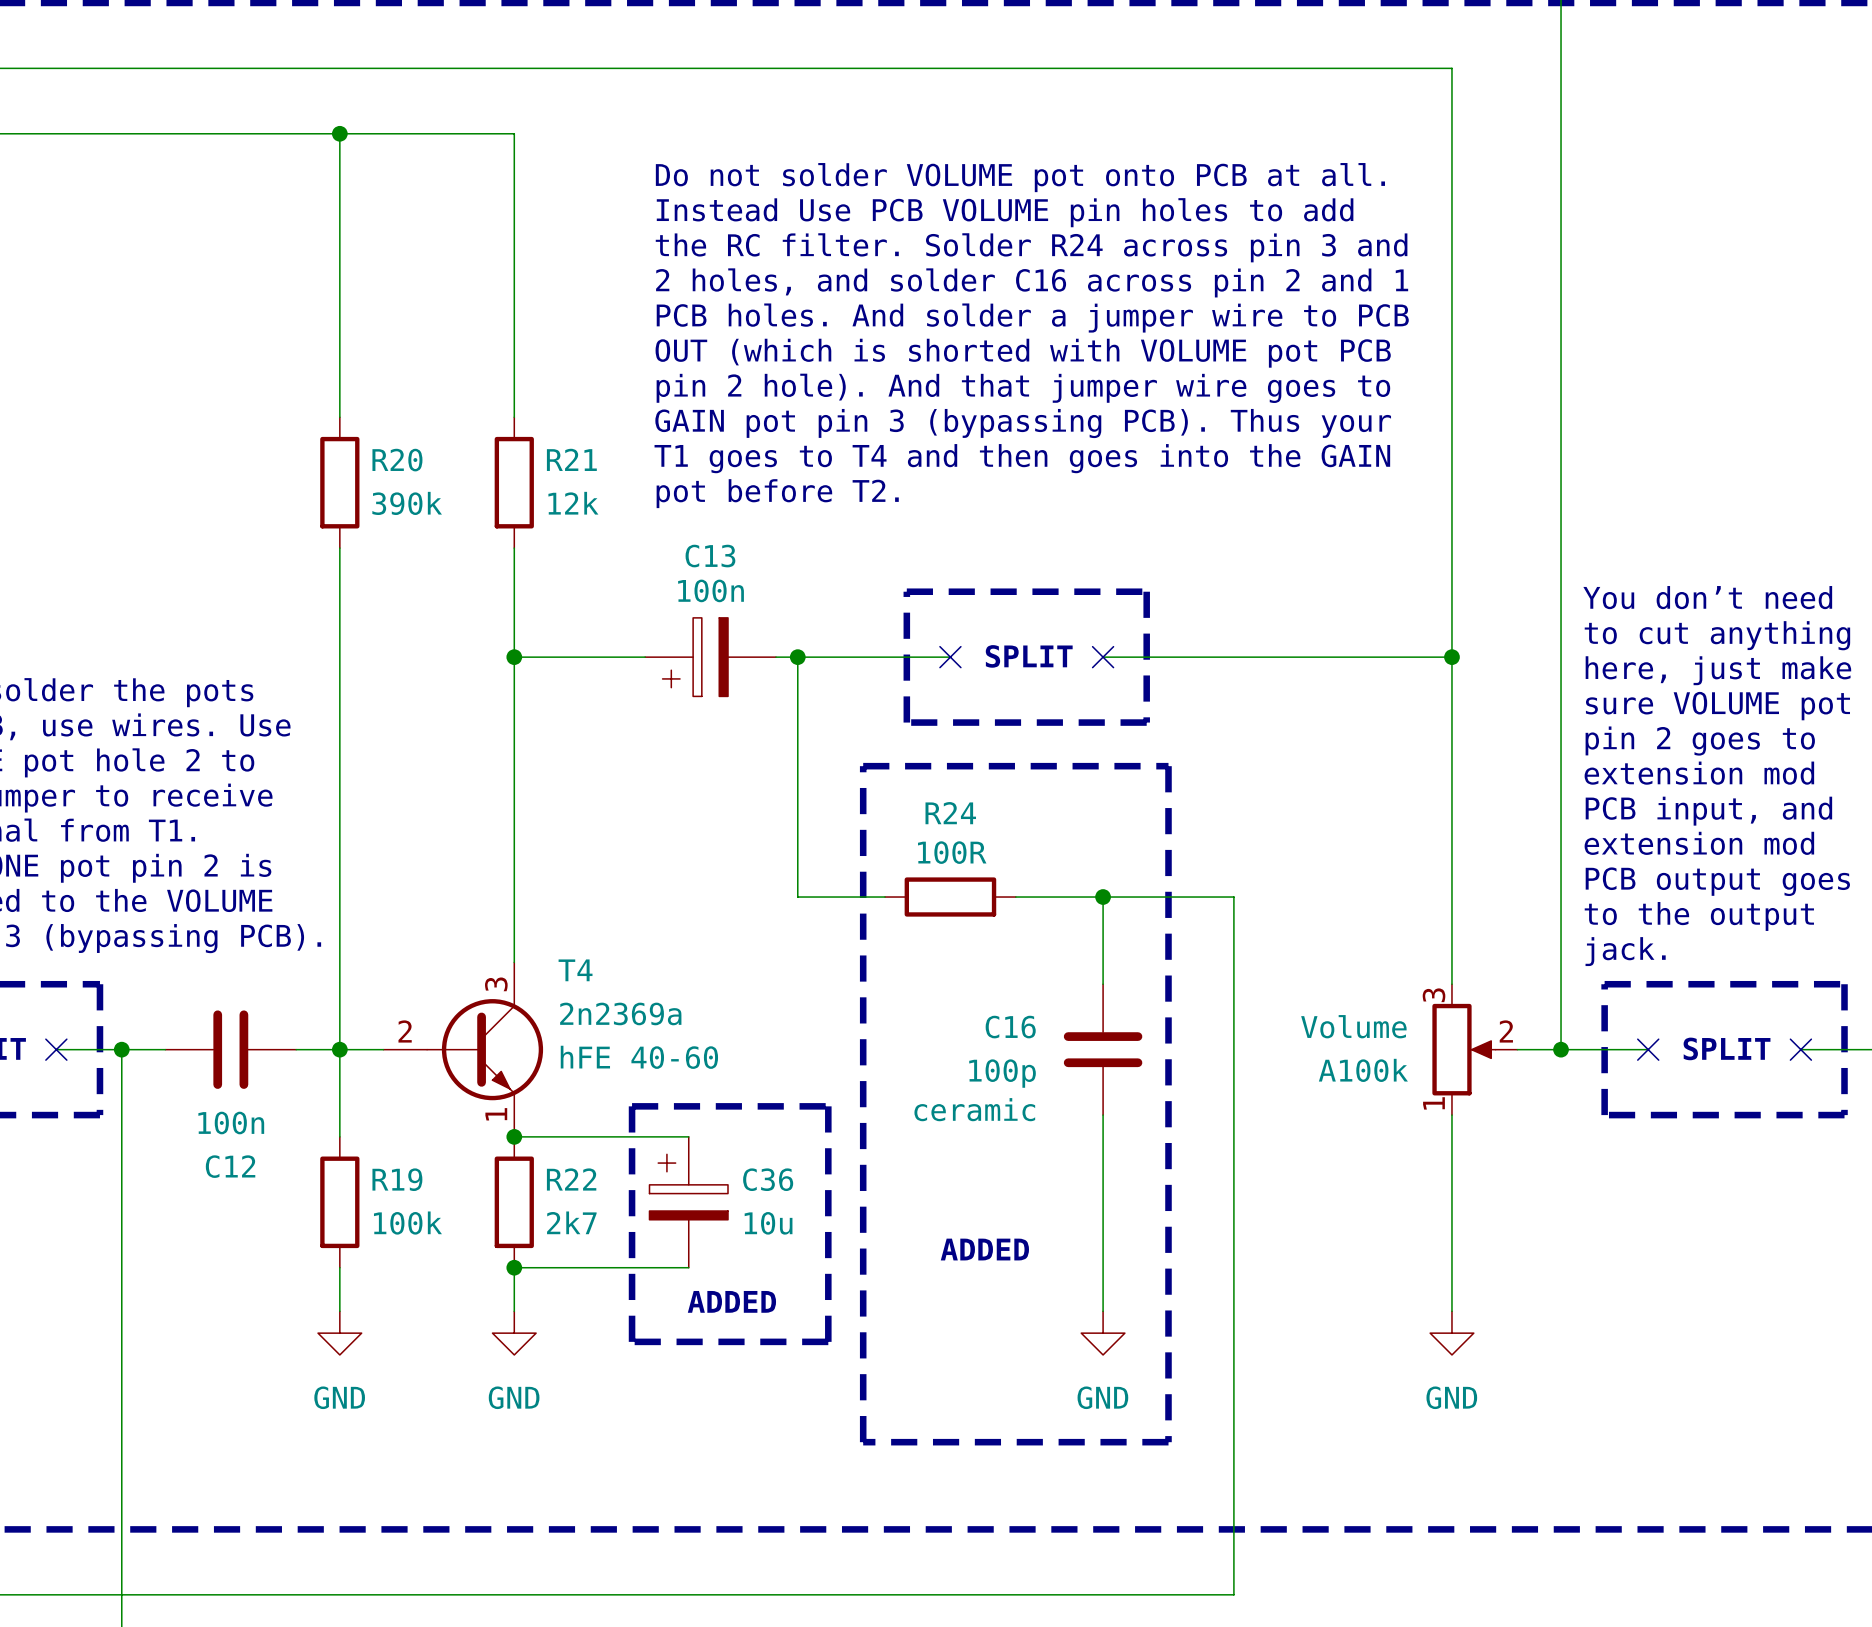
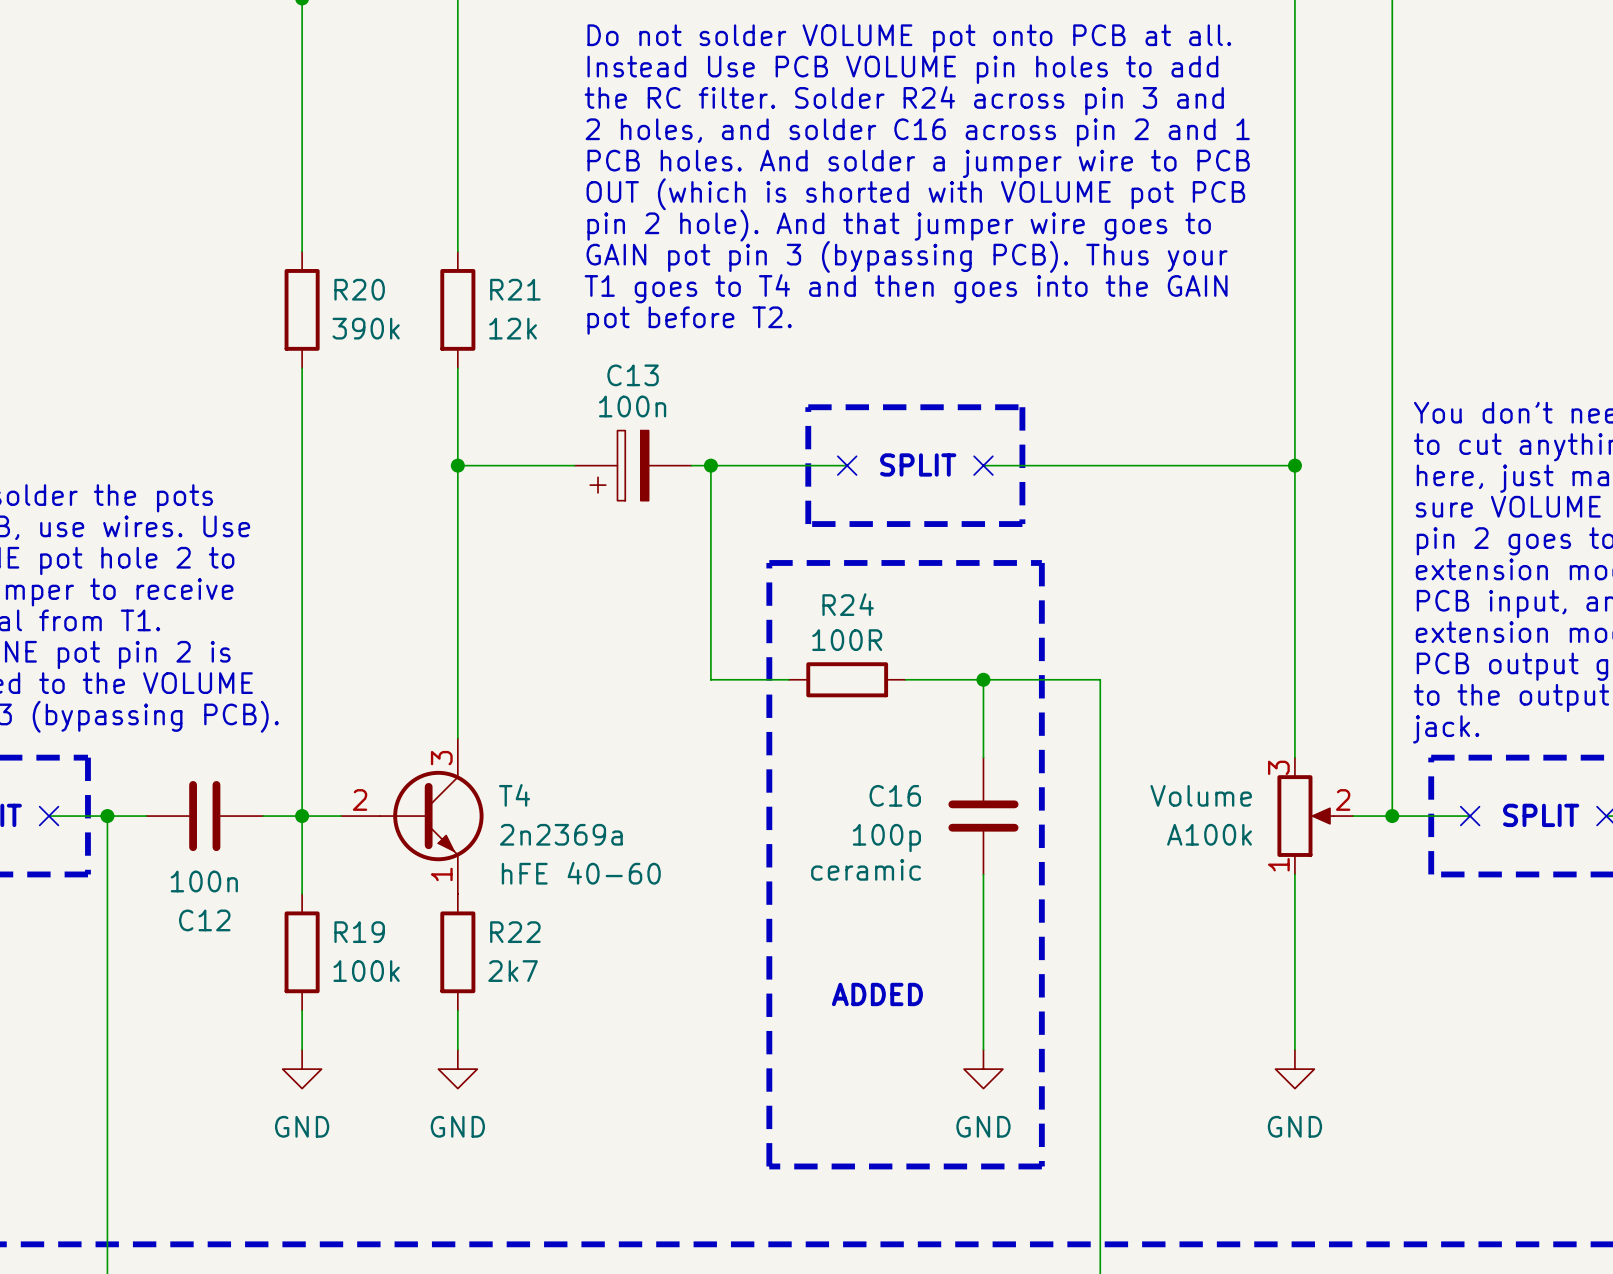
T4 name position: T4 (575, 970) -> T4 (514, 795)
T4 value position: 2n2369a (620, 1013) -> 2n2369a (561, 834)
T4 text position: hFE 40-60 (639, 1057) -> hFE 40-60 (581, 873)
line: (632, 1106) (828, 1106) (828, 1341) (632, 1341) (632, 1106) -> none
wire: (514, 1136) (688, 1136) -> none
junction: (514, 1136) -> none
C36: 10u (688, 1202) -> none
wire: (514, 1267) (688, 1267) -> none
junction: (514, 1267) -> none
text: ADDED (731, 1301) -> none

